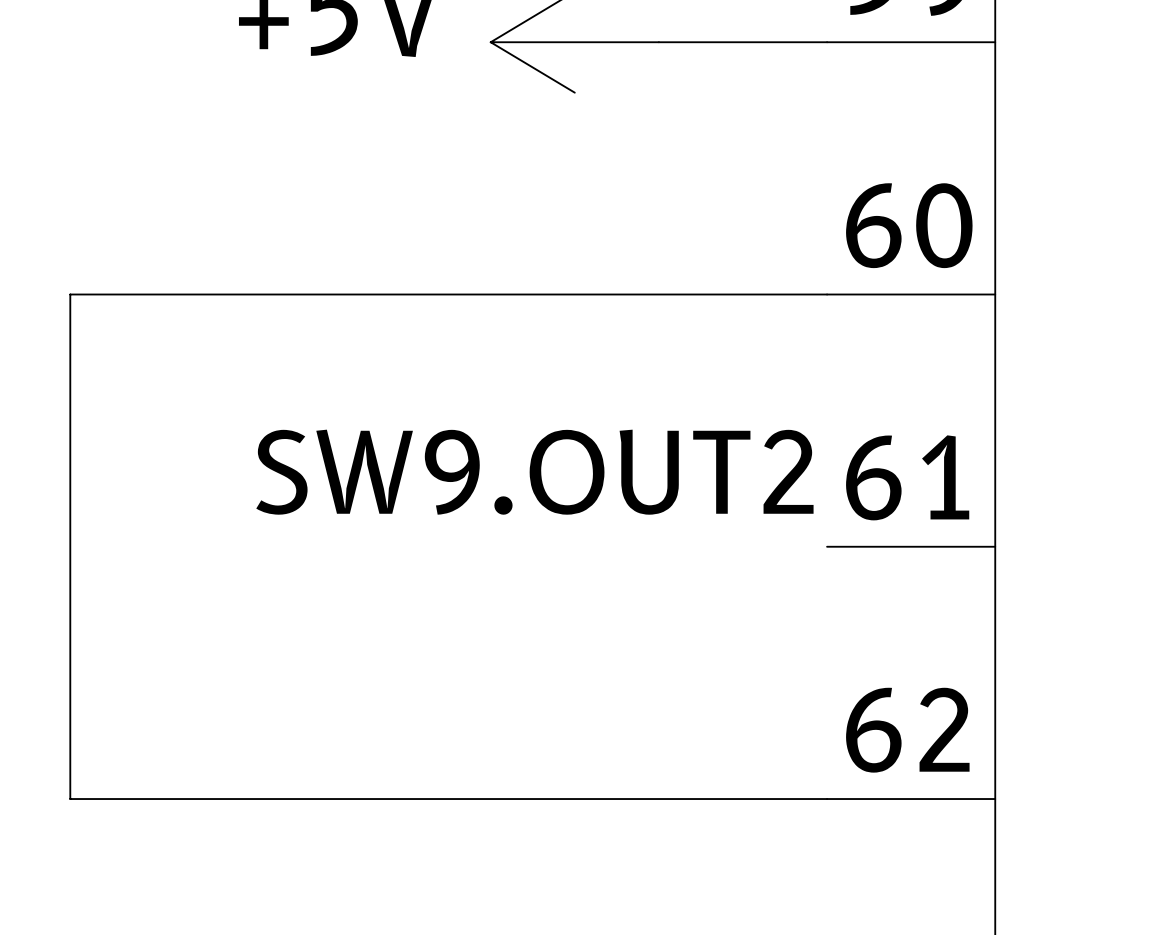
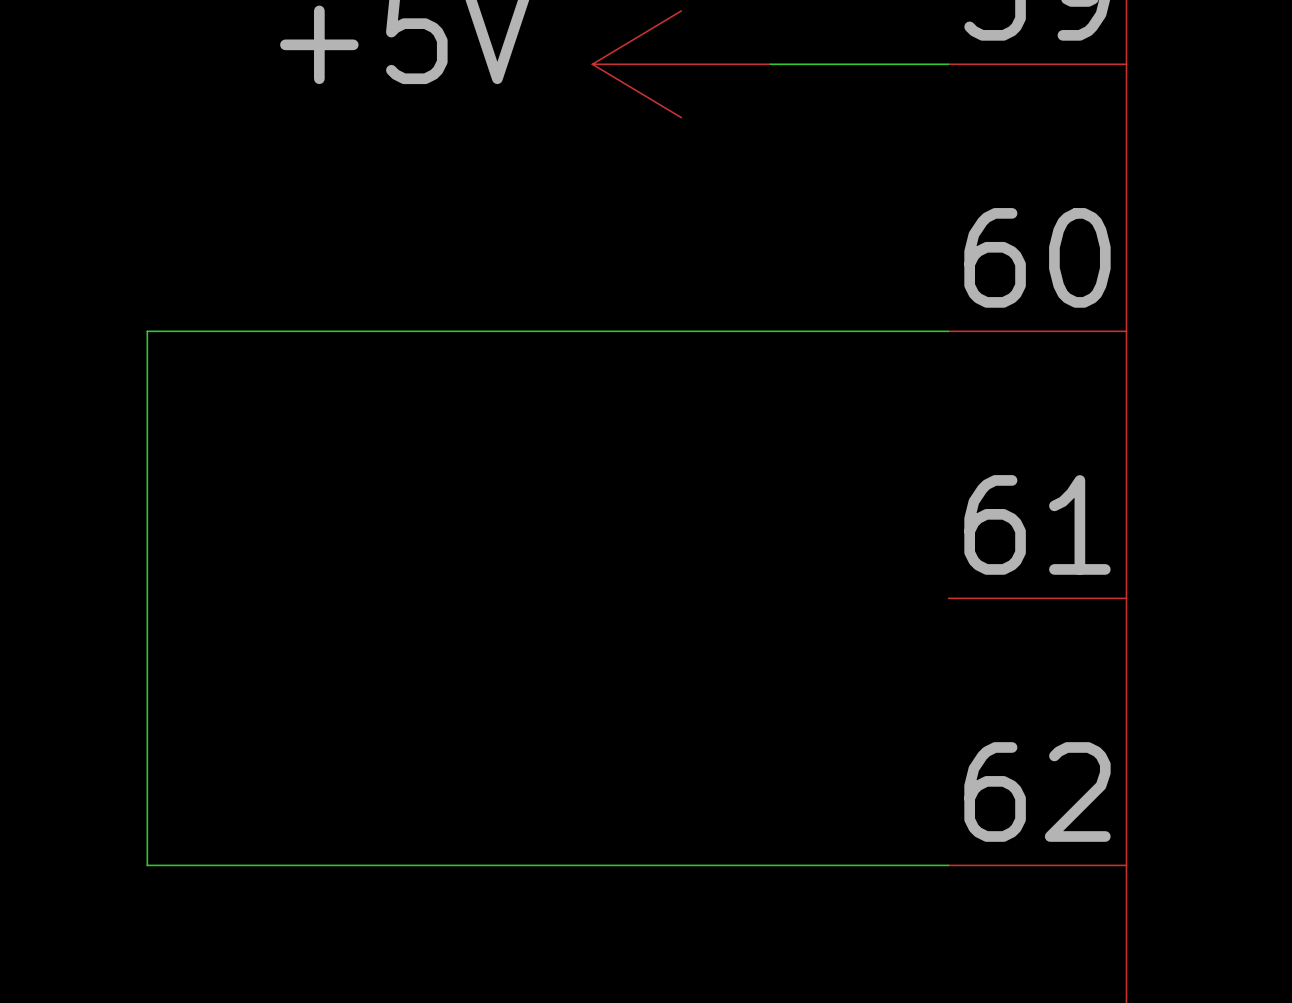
label: SW9.OUT2 (534, 472) -> none

